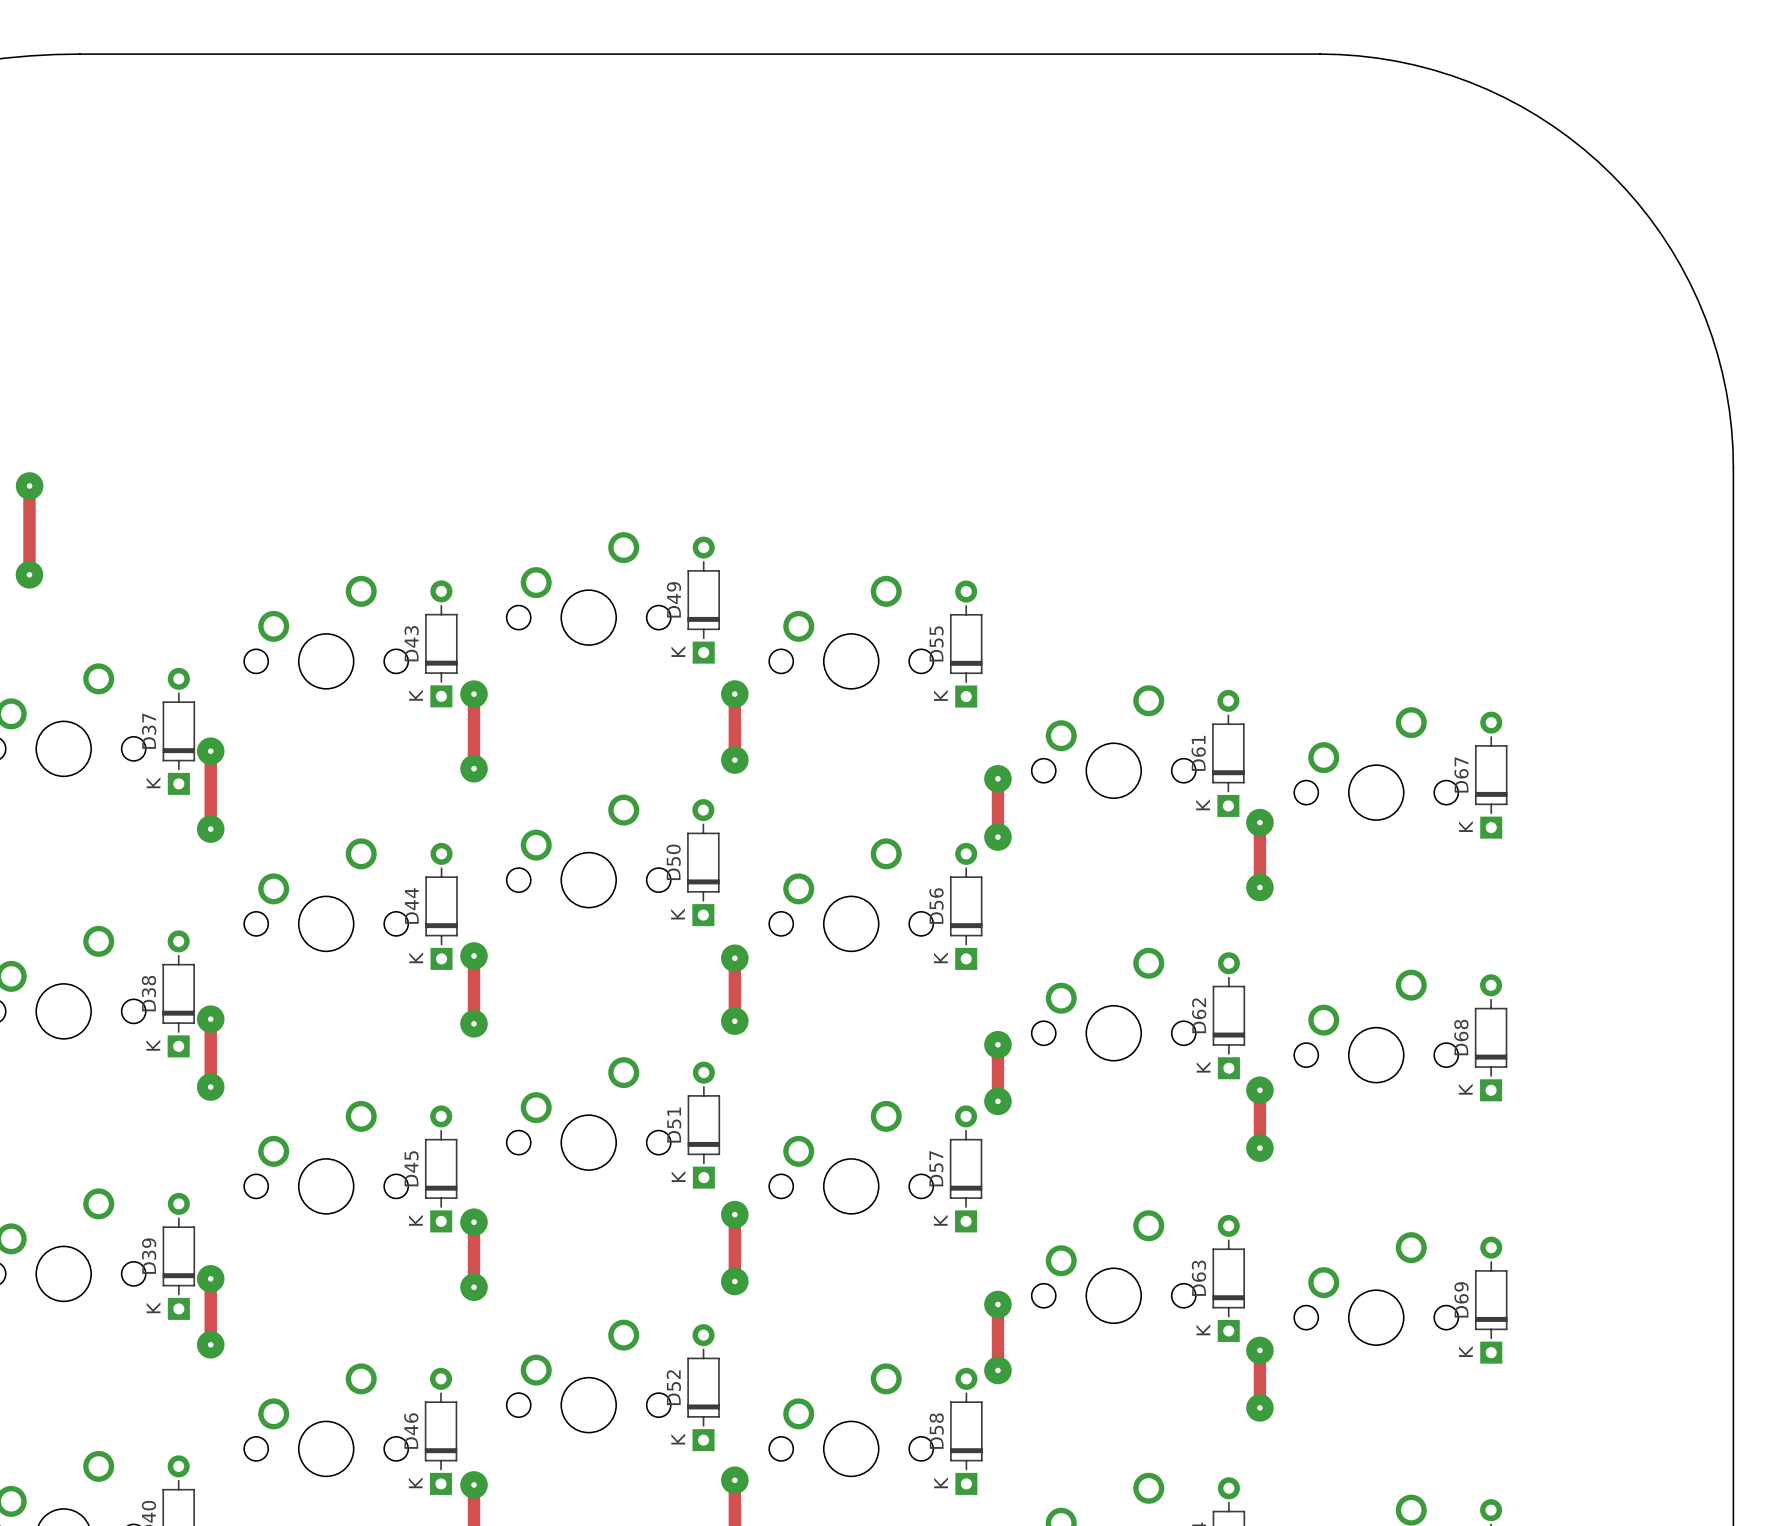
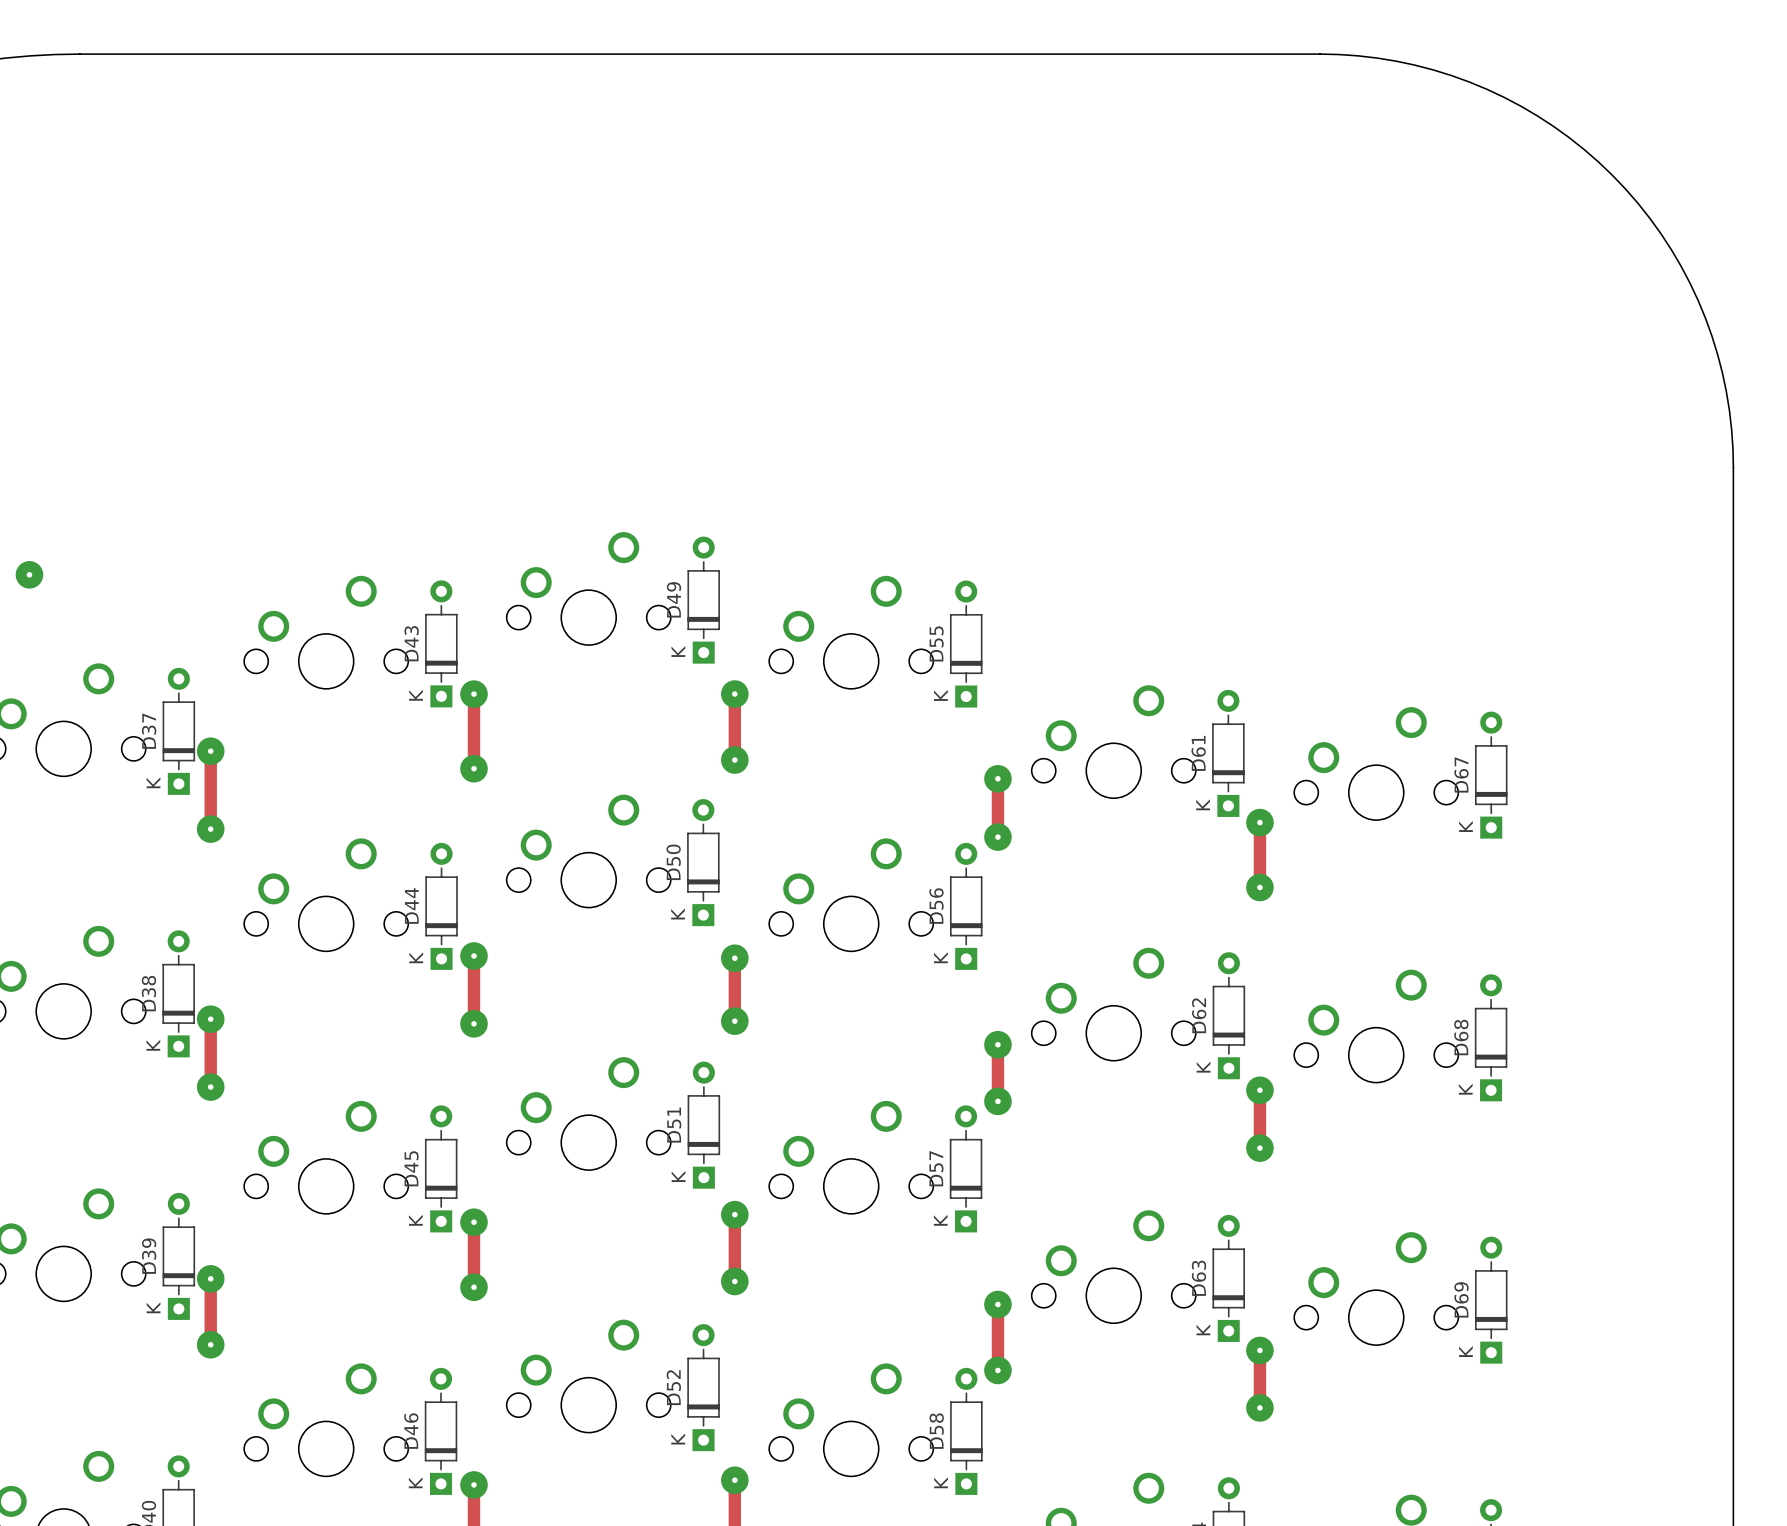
via: (29, 485) -> none
track: (29, 486) (29, 574) -> none

